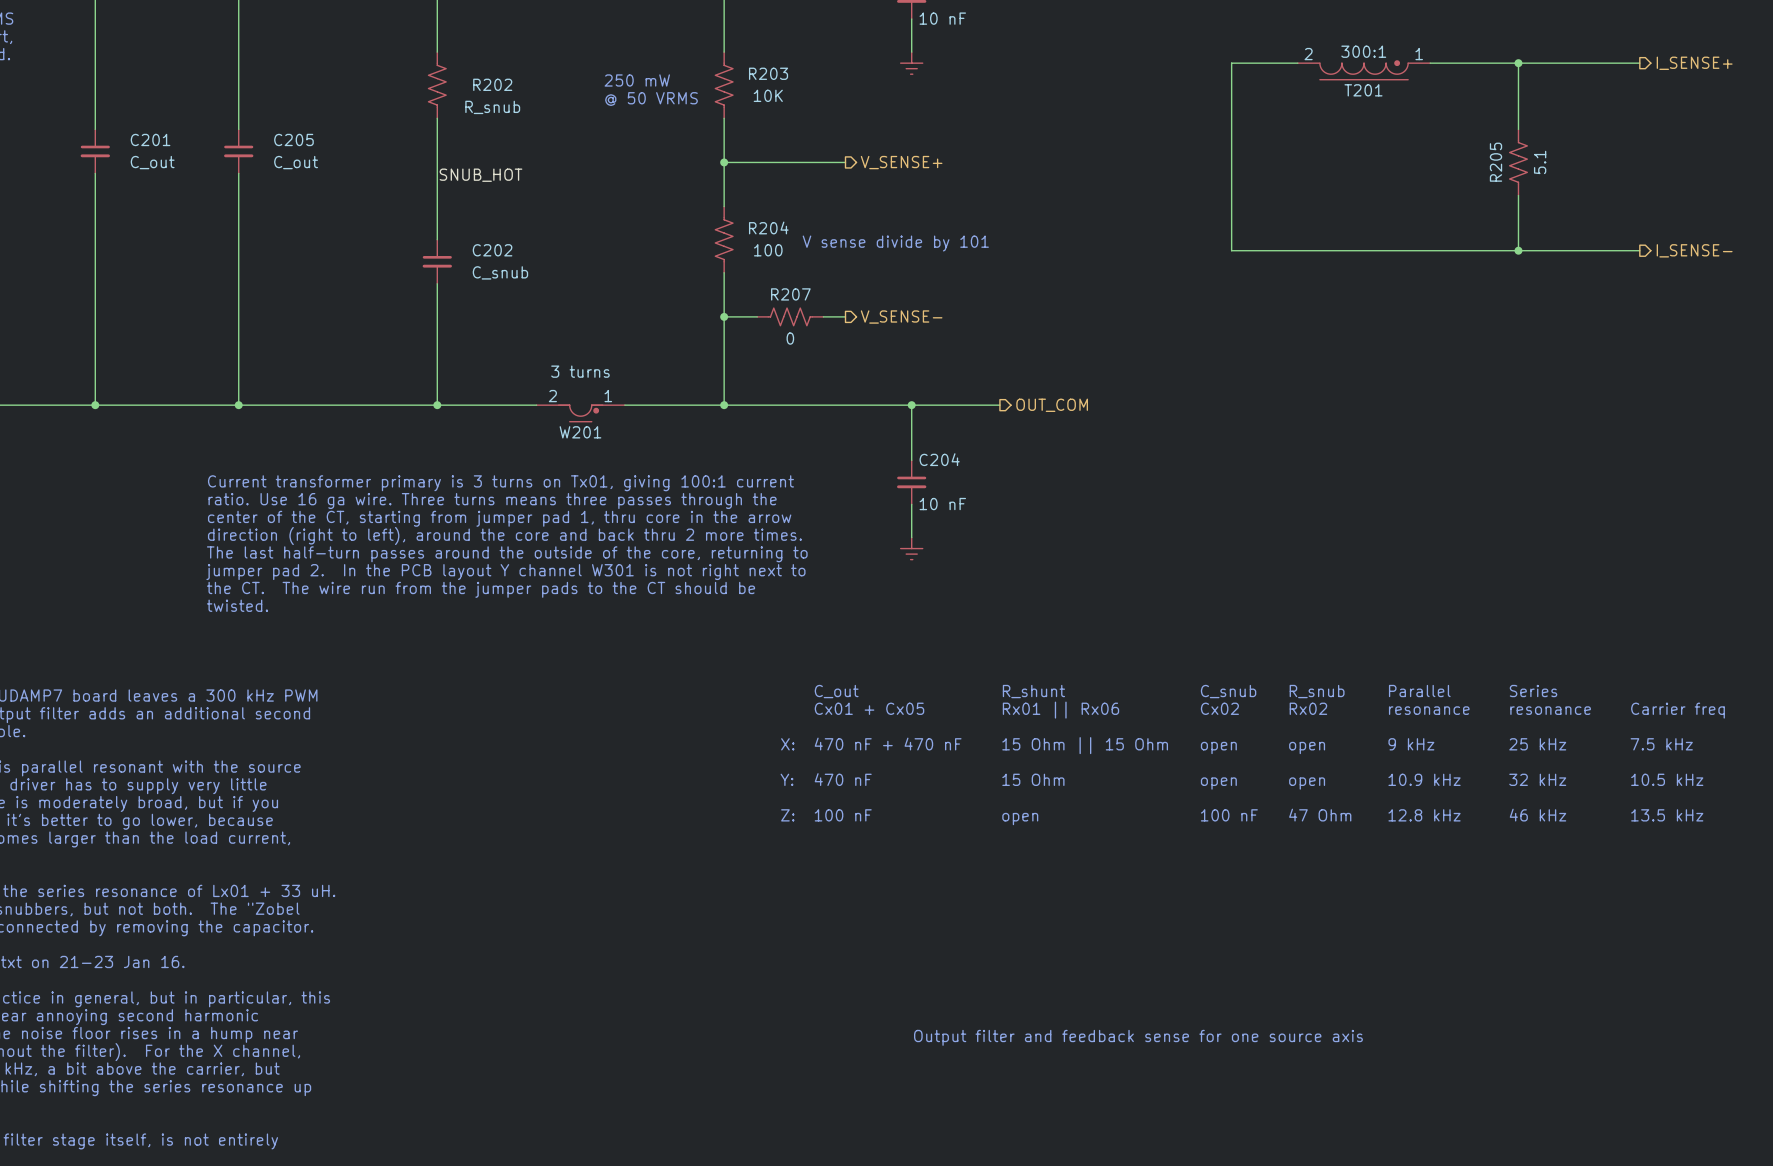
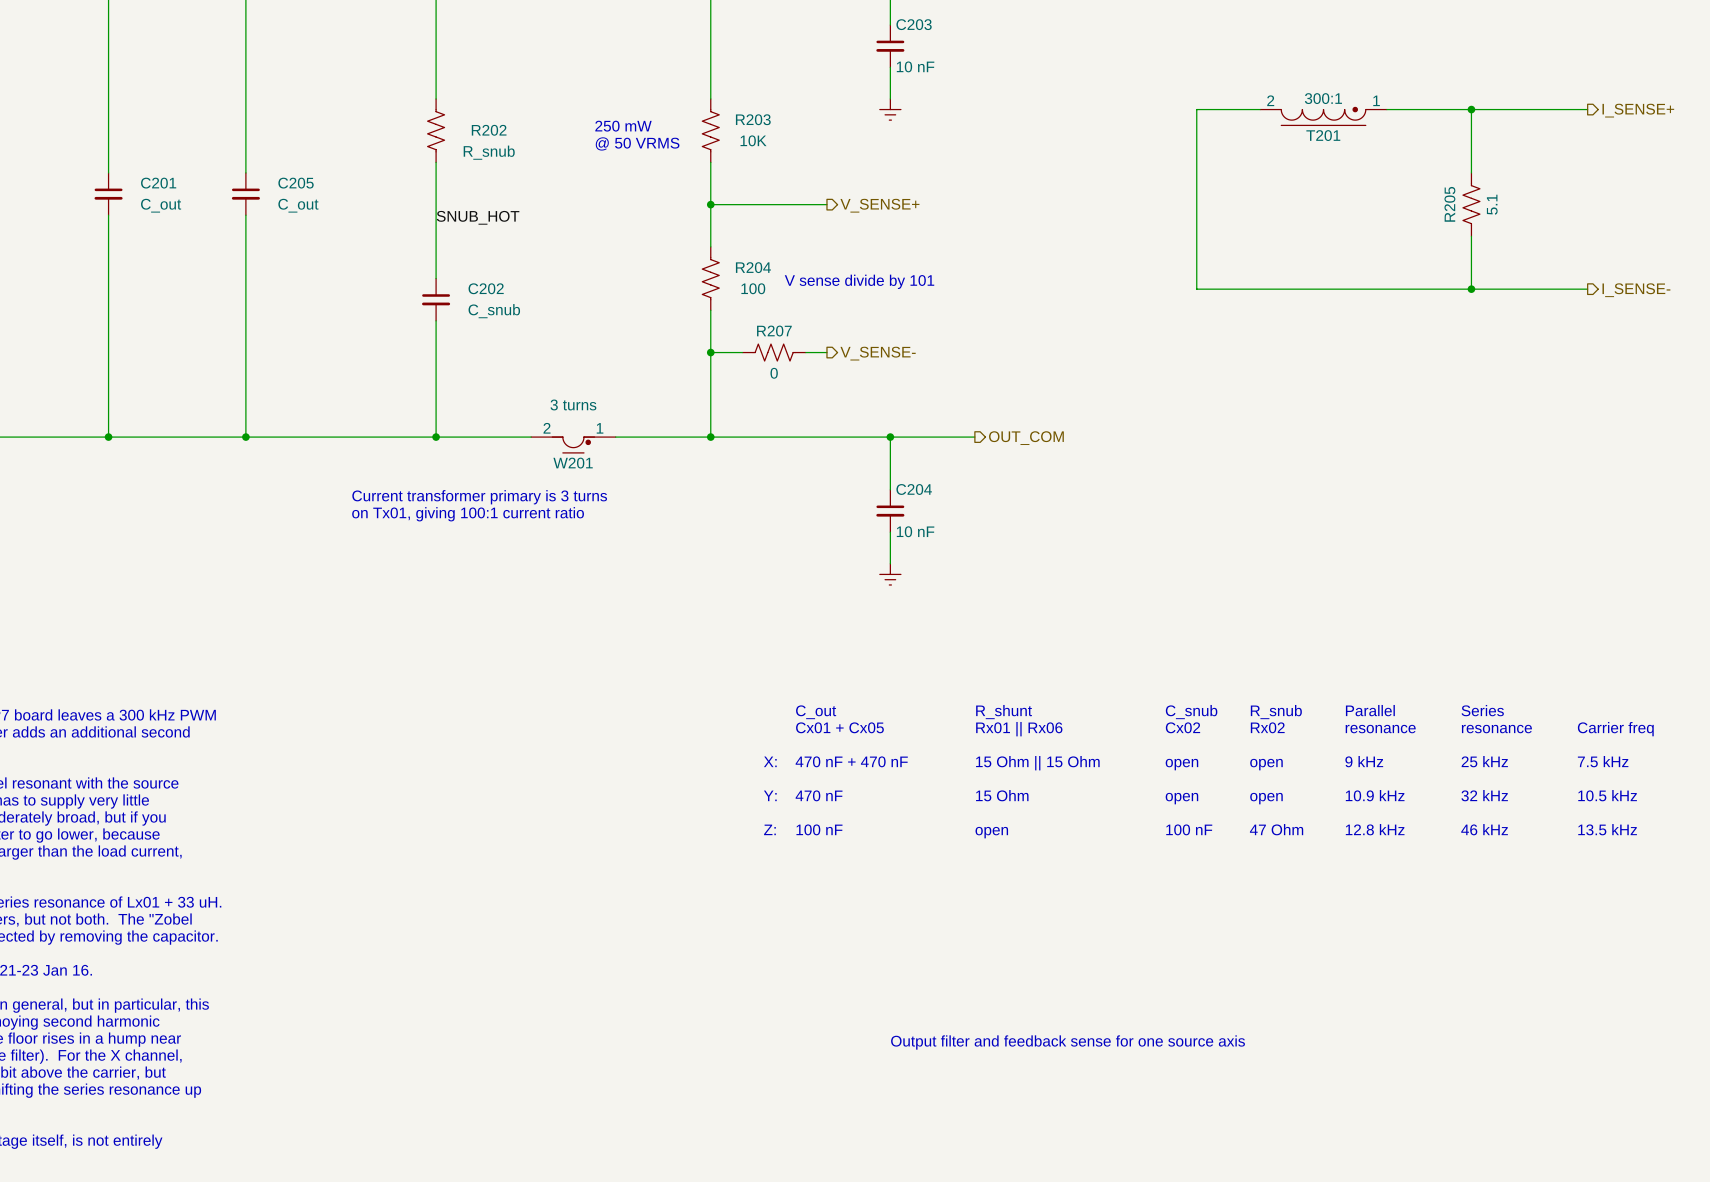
text: Current transformer primary is 3 turns on Tx01, giving 100:1 current (500, 483) -> Current transformer primary is 3 turns (479, 497)
text: none -> on Tx01, giving 100:1 current ratio (468, 514)
text: ratio. Use 16 ga wire. Three turns means three passes through the (492, 501) -> none
text: center of the CT, starting from jumper pad 1, thru core in the arrow (499, 518) -> none
text: direction (right to left), around the core and back thru 2 more times. (504, 536) -> none
text: The last half-turn passes around the outside of the core, returning to (507, 554) -> none
text: jumper pad 2. In the PCB layout Y channel W301 is not right next to (505, 572) -> none
text: the CT. The wire run from the jumper pads to the CT should be (480, 589) -> none
text: twisted. (237, 605) -> none

